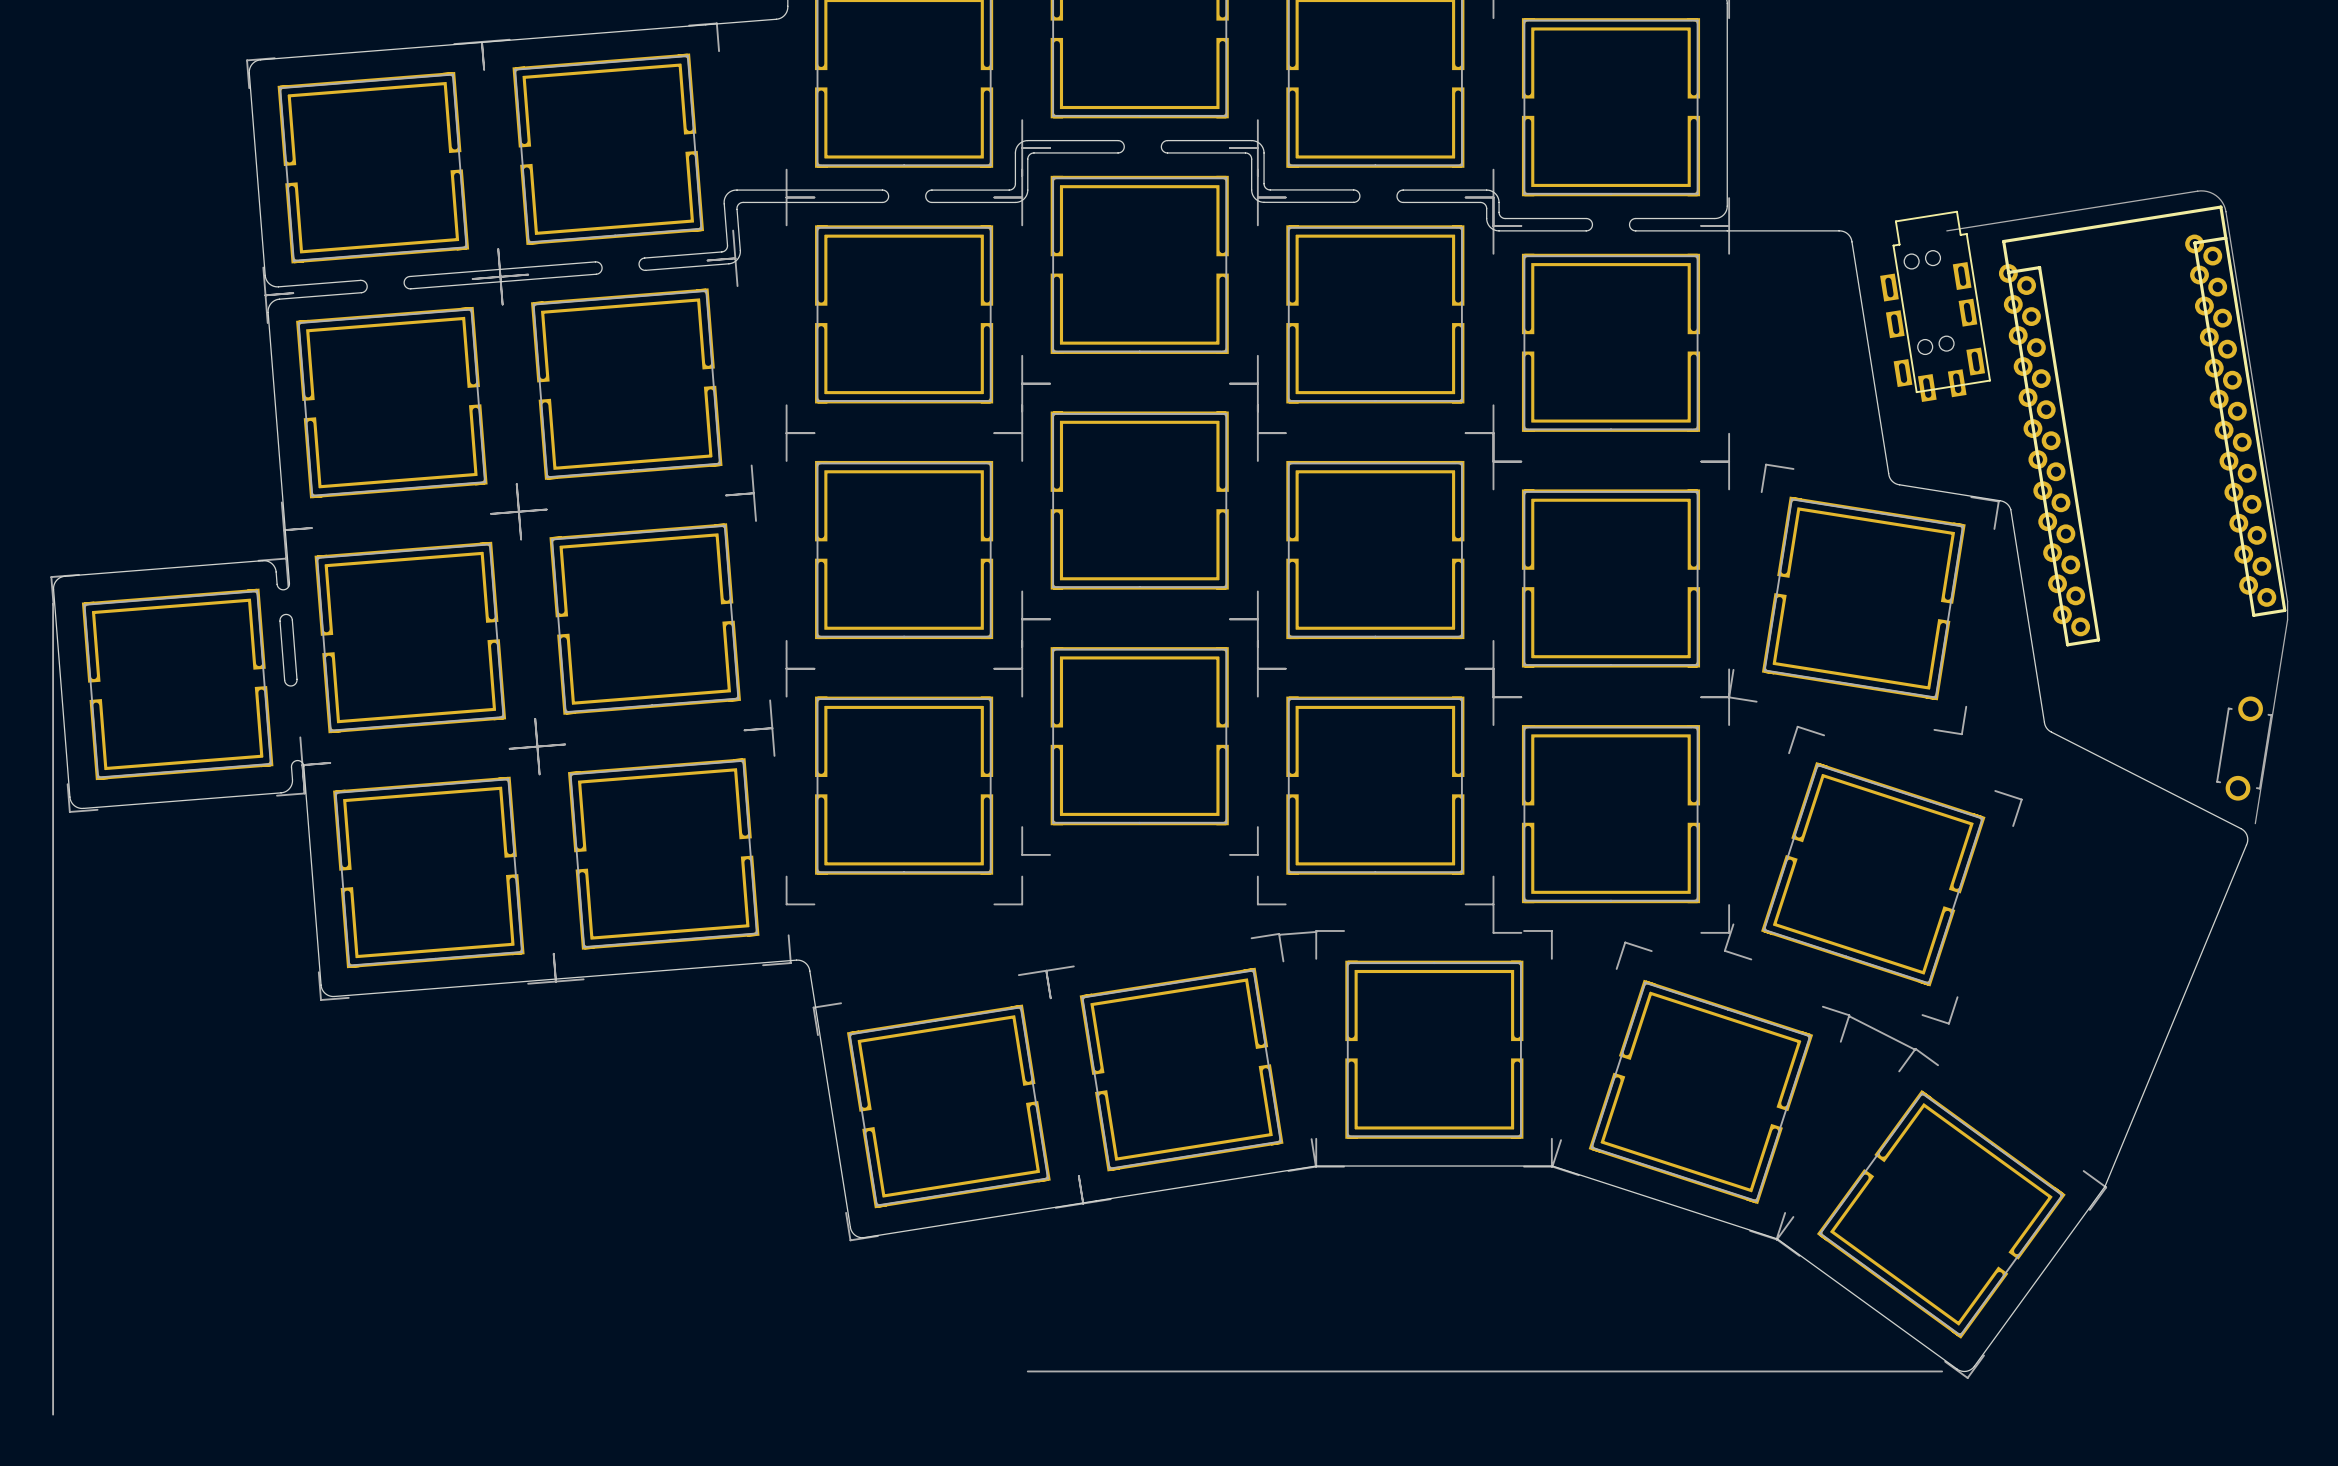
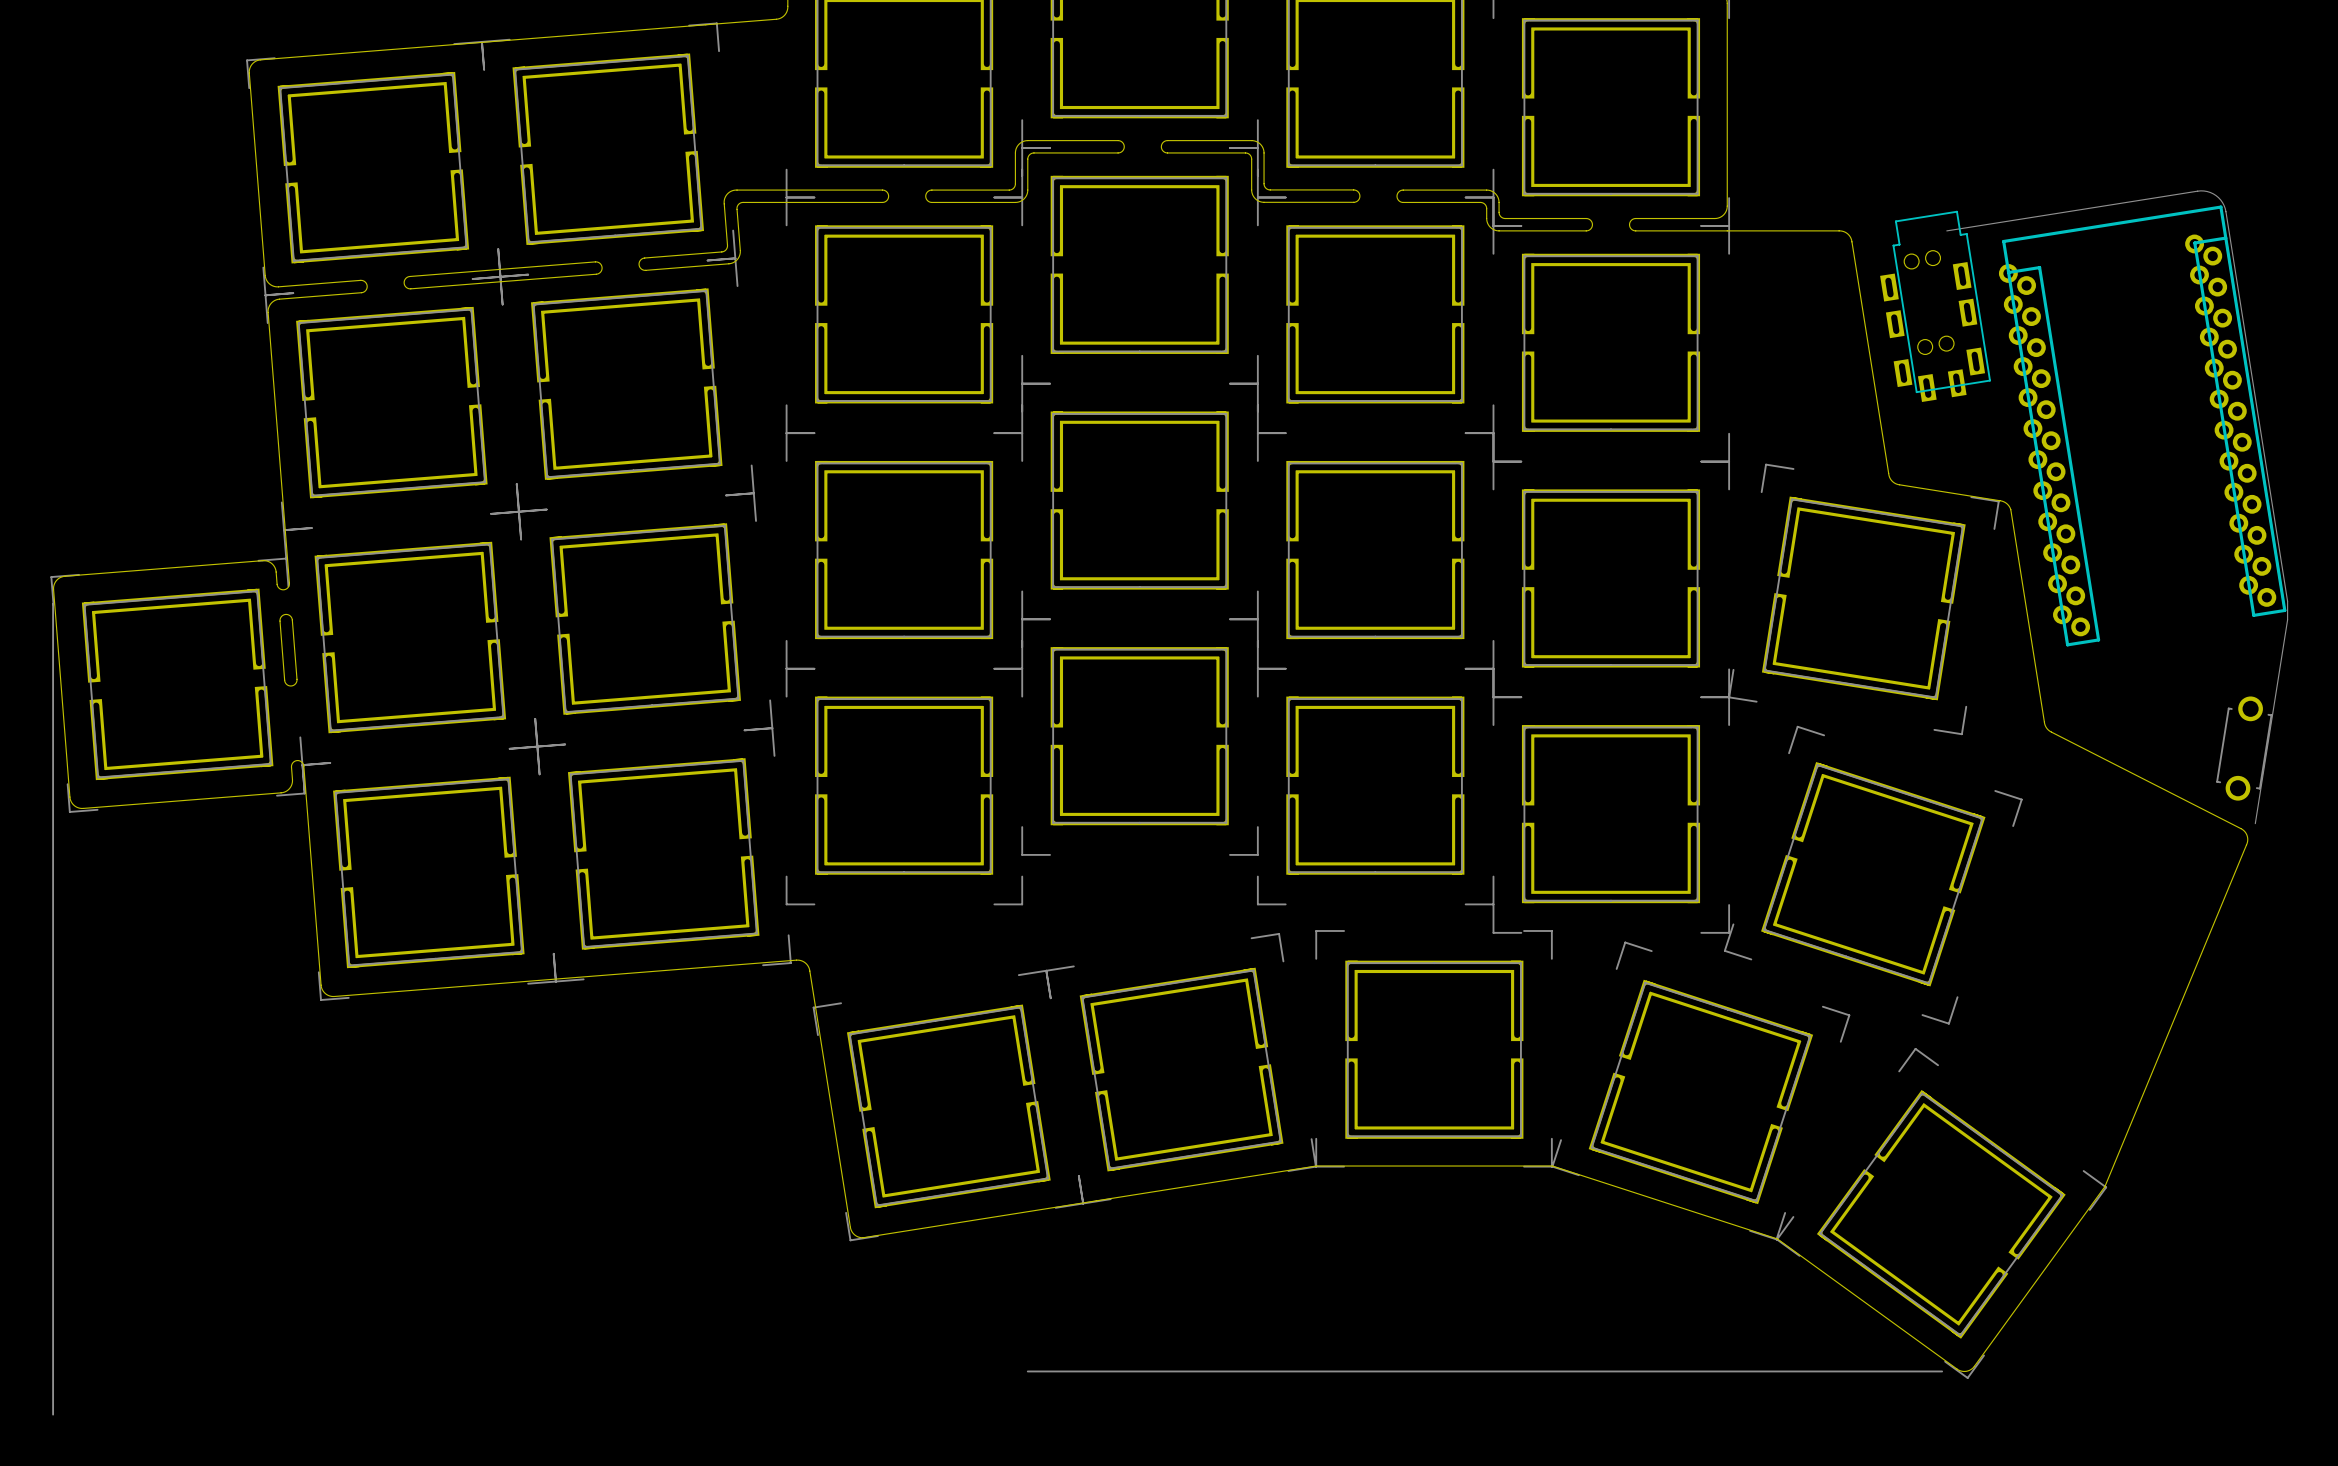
line: (1316, 931) (1279, 934) -> none
line: (1849, 1016) (1915, 1049) -> none

